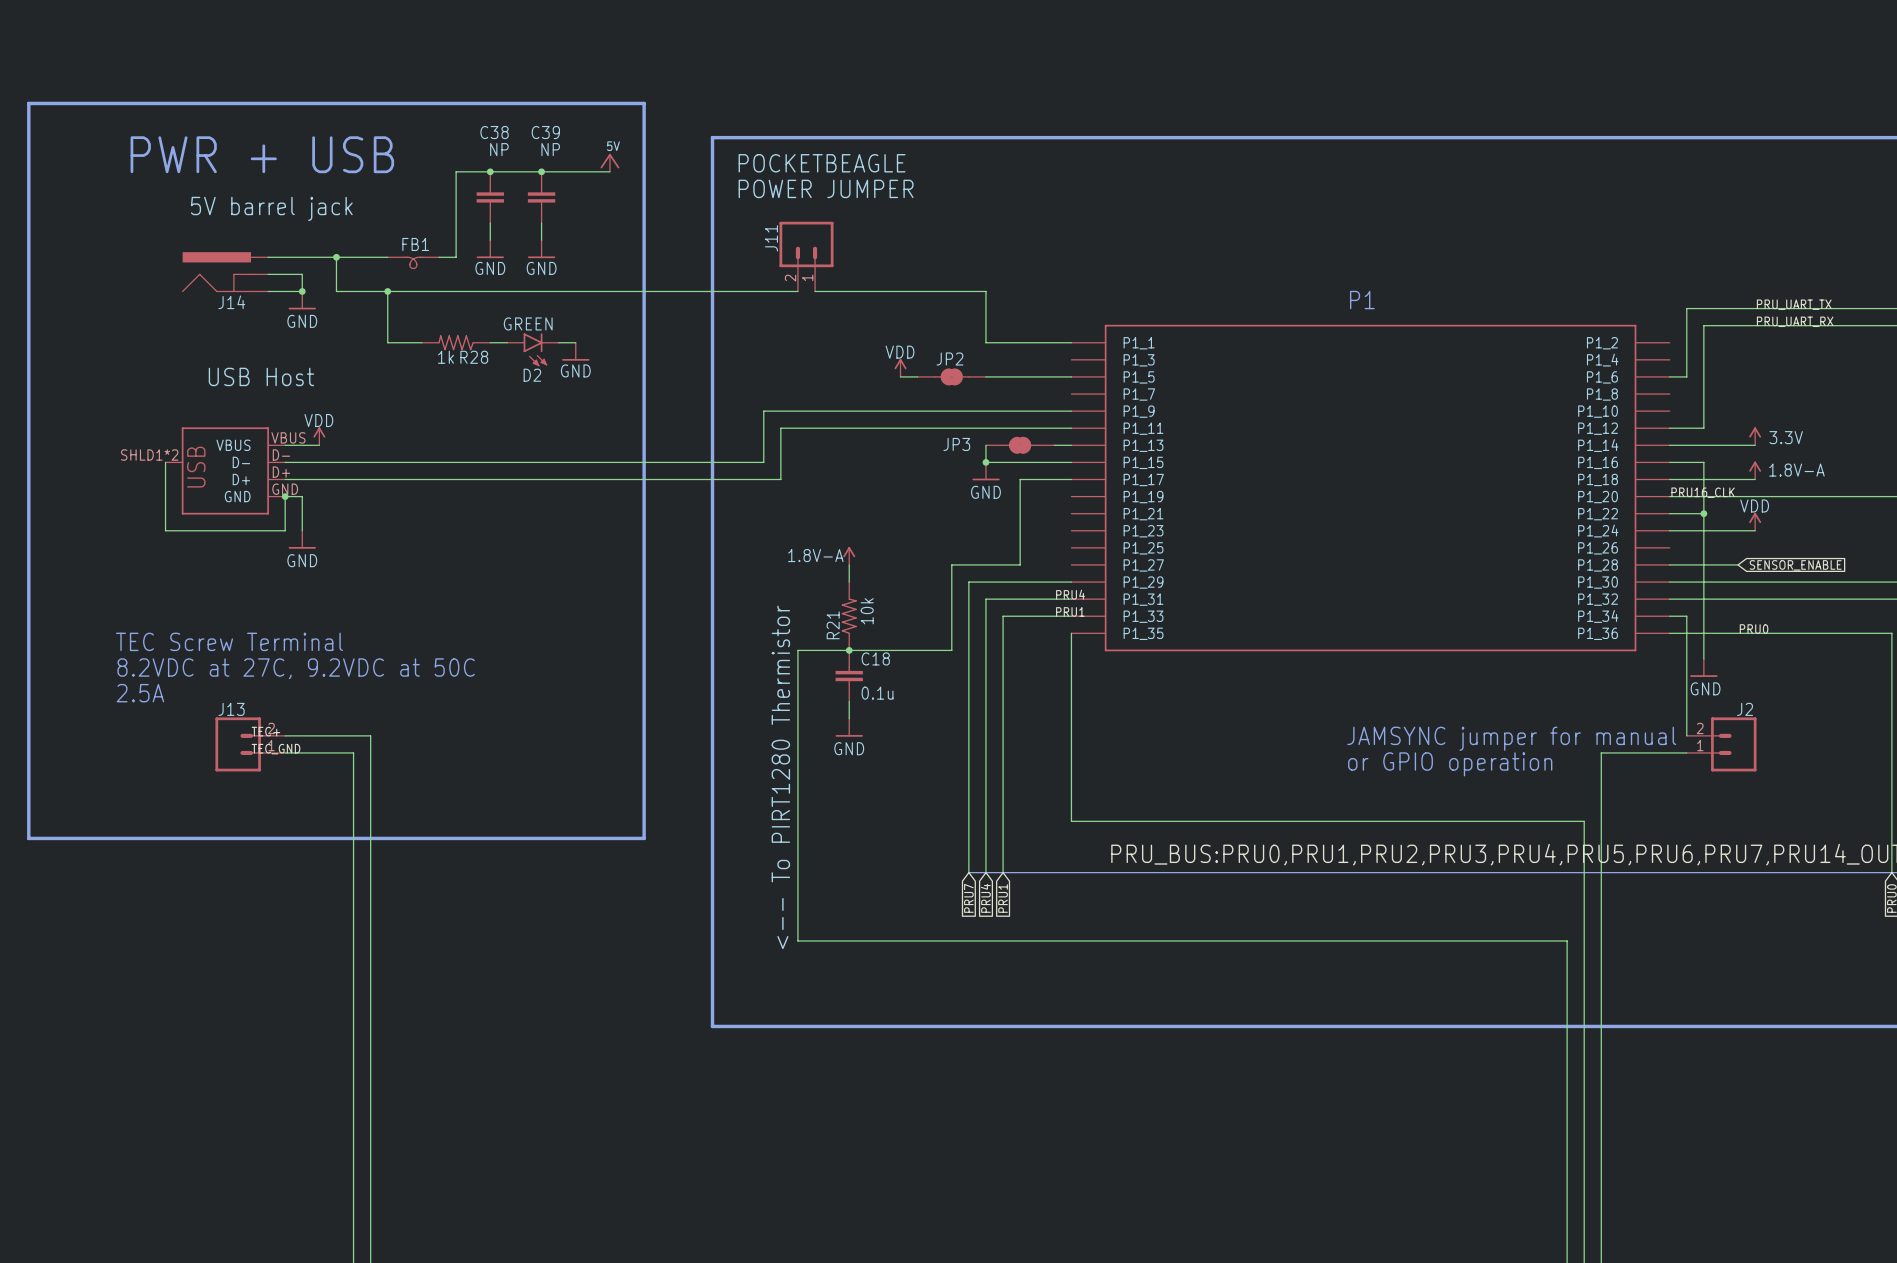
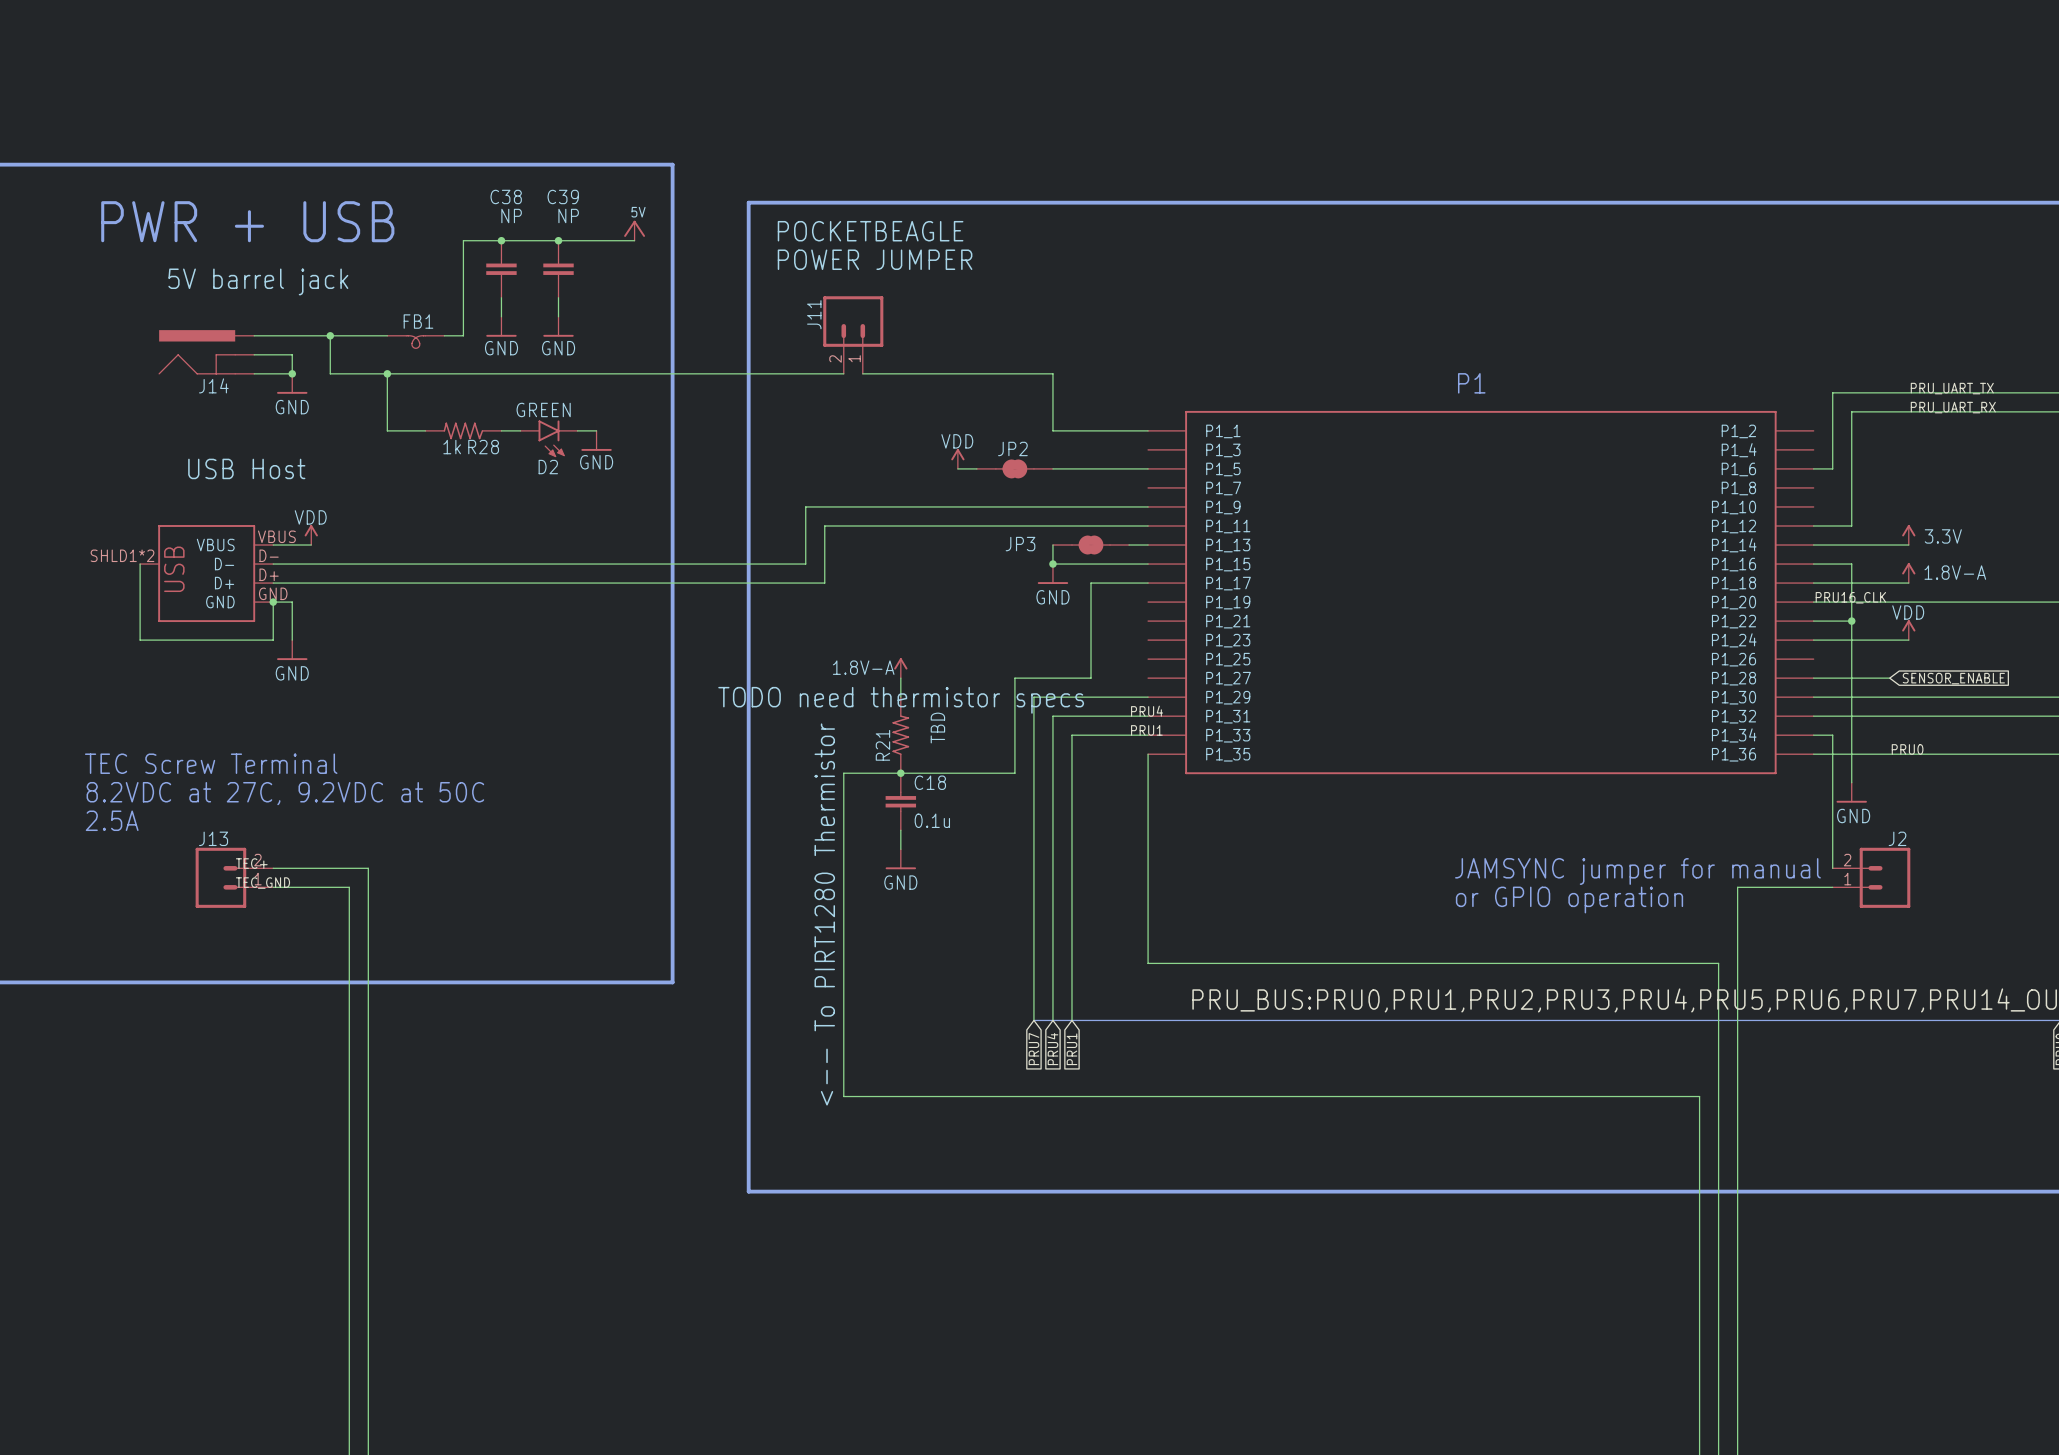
text: none -> TODO need thermistor specs (901, 700)
R21 value: 10k (867, 611) -> TBD (937, 728)

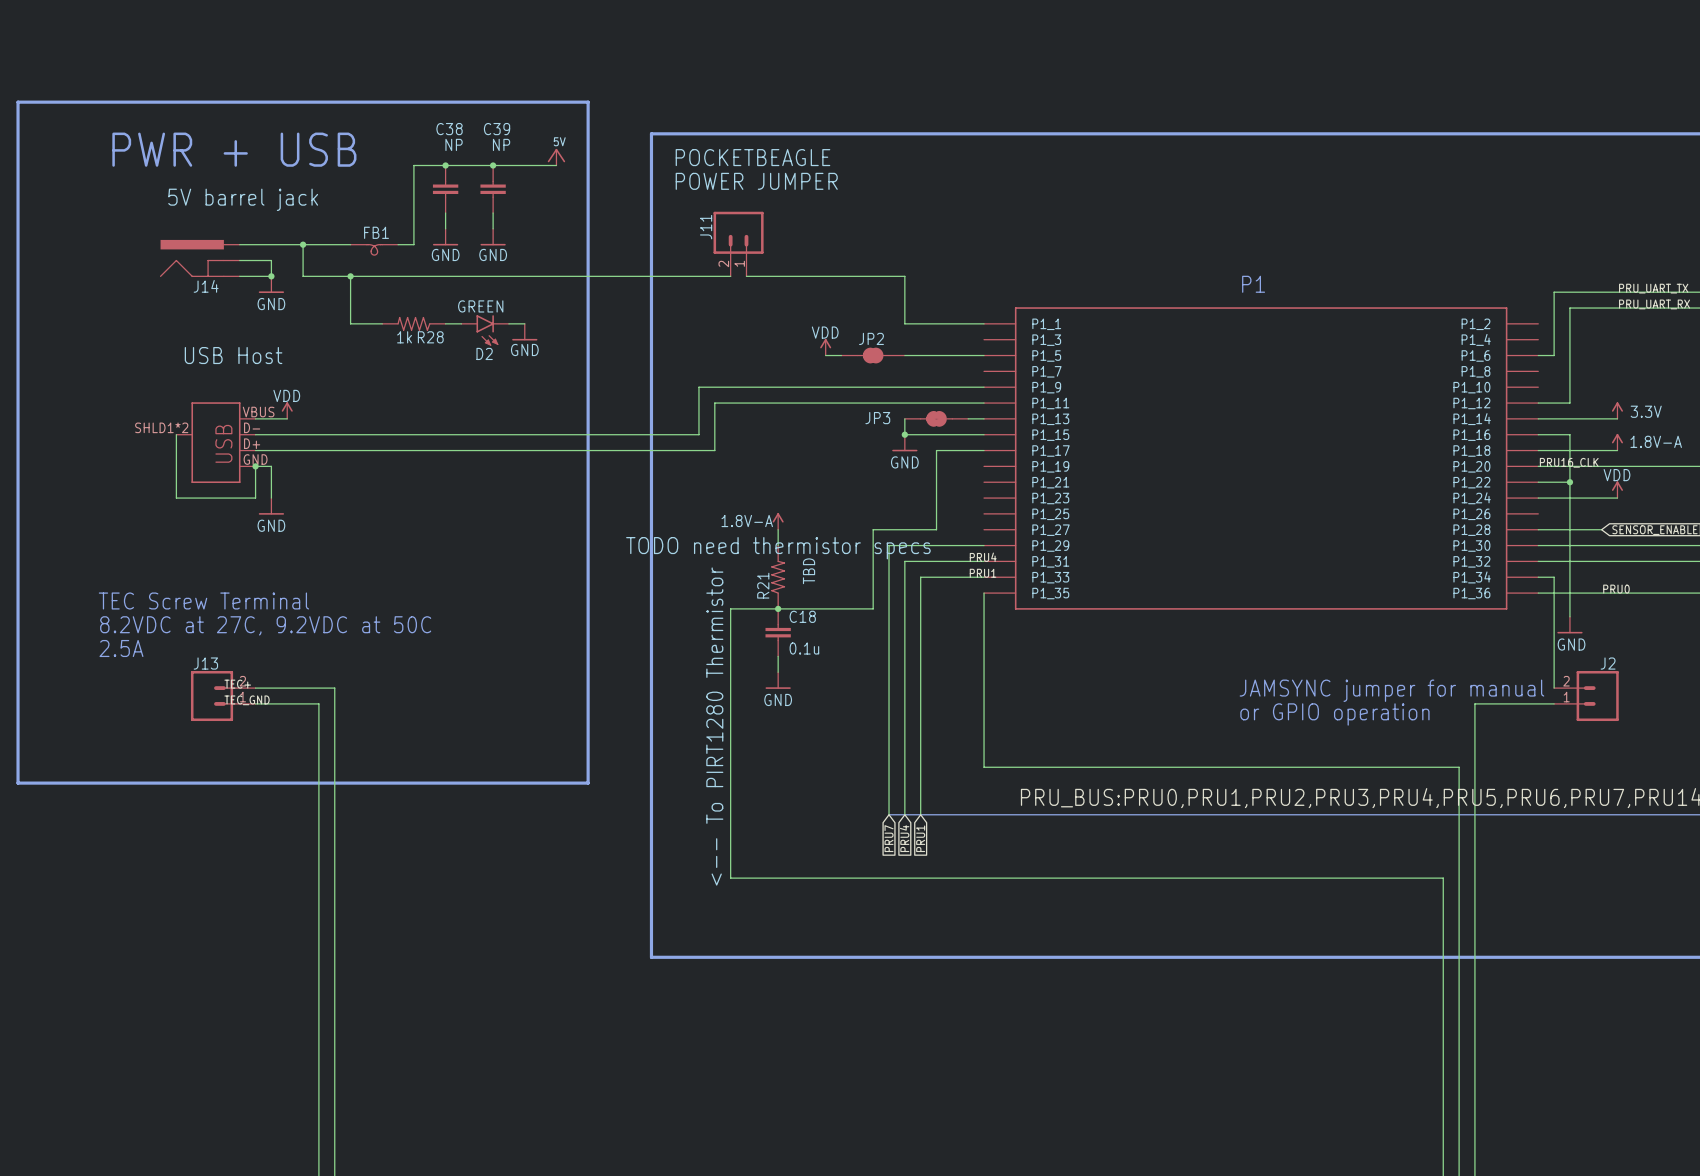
wire: (140, 564) (140, 640) (178, 640) -> (176, 434) (176, 498)
part: (206, 573) -> none
part: none -> (215, 442)

